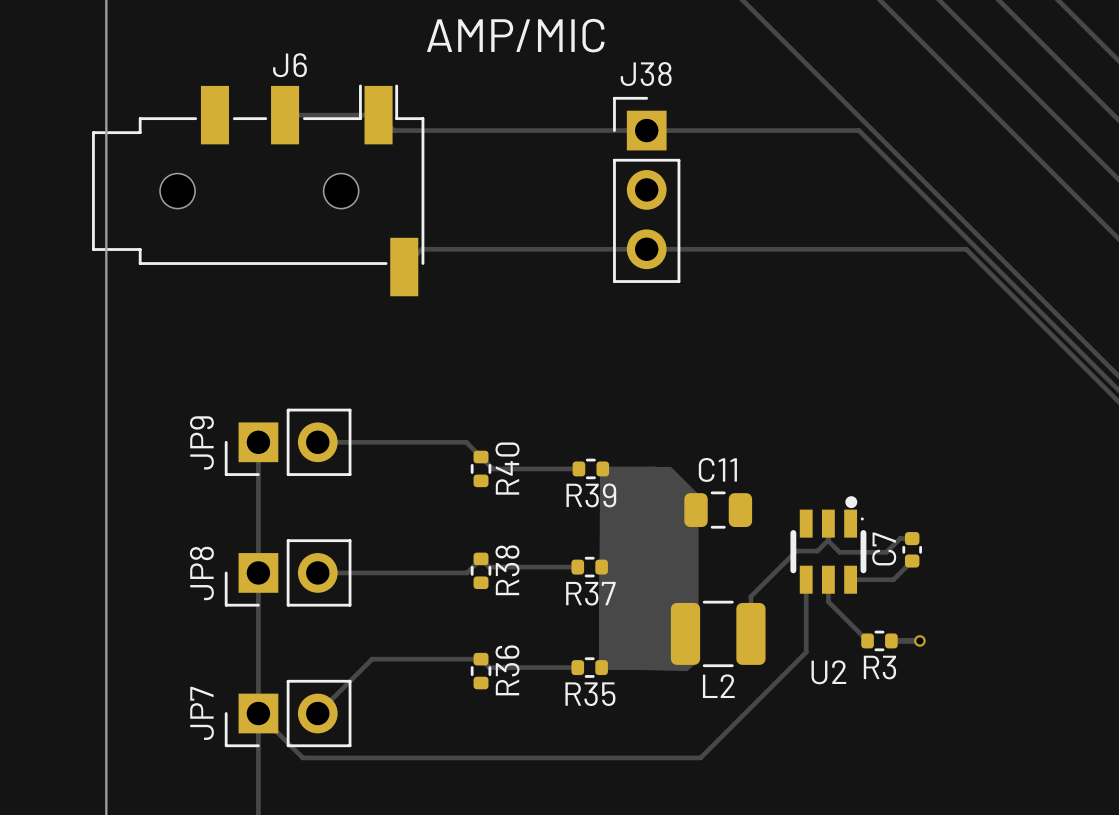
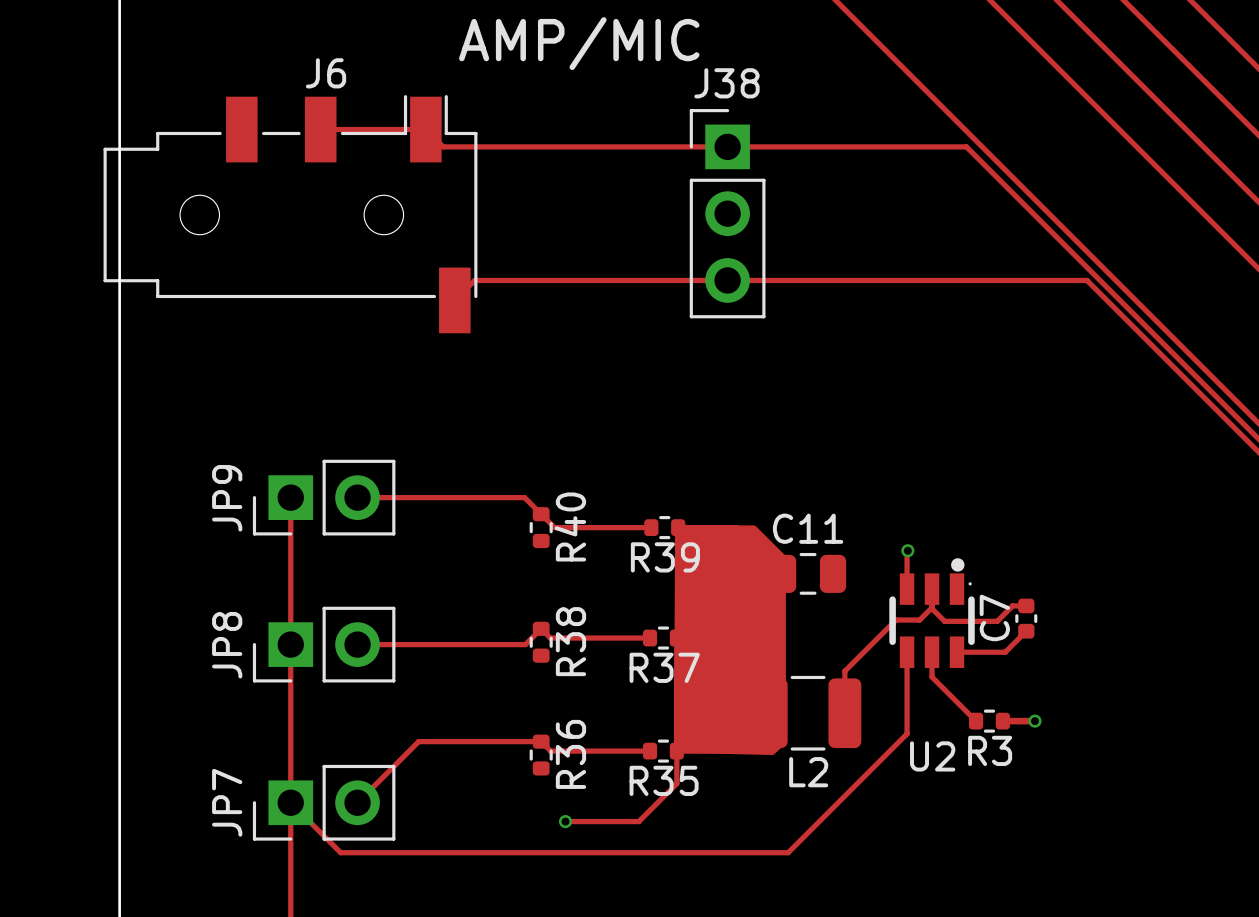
track: none -> (907, 550) (907, 589)
via: none -> (907, 550)
track: none -> (676, 751) (676, 783) (638, 821) (565, 821)
via: none -> (565, 821)

